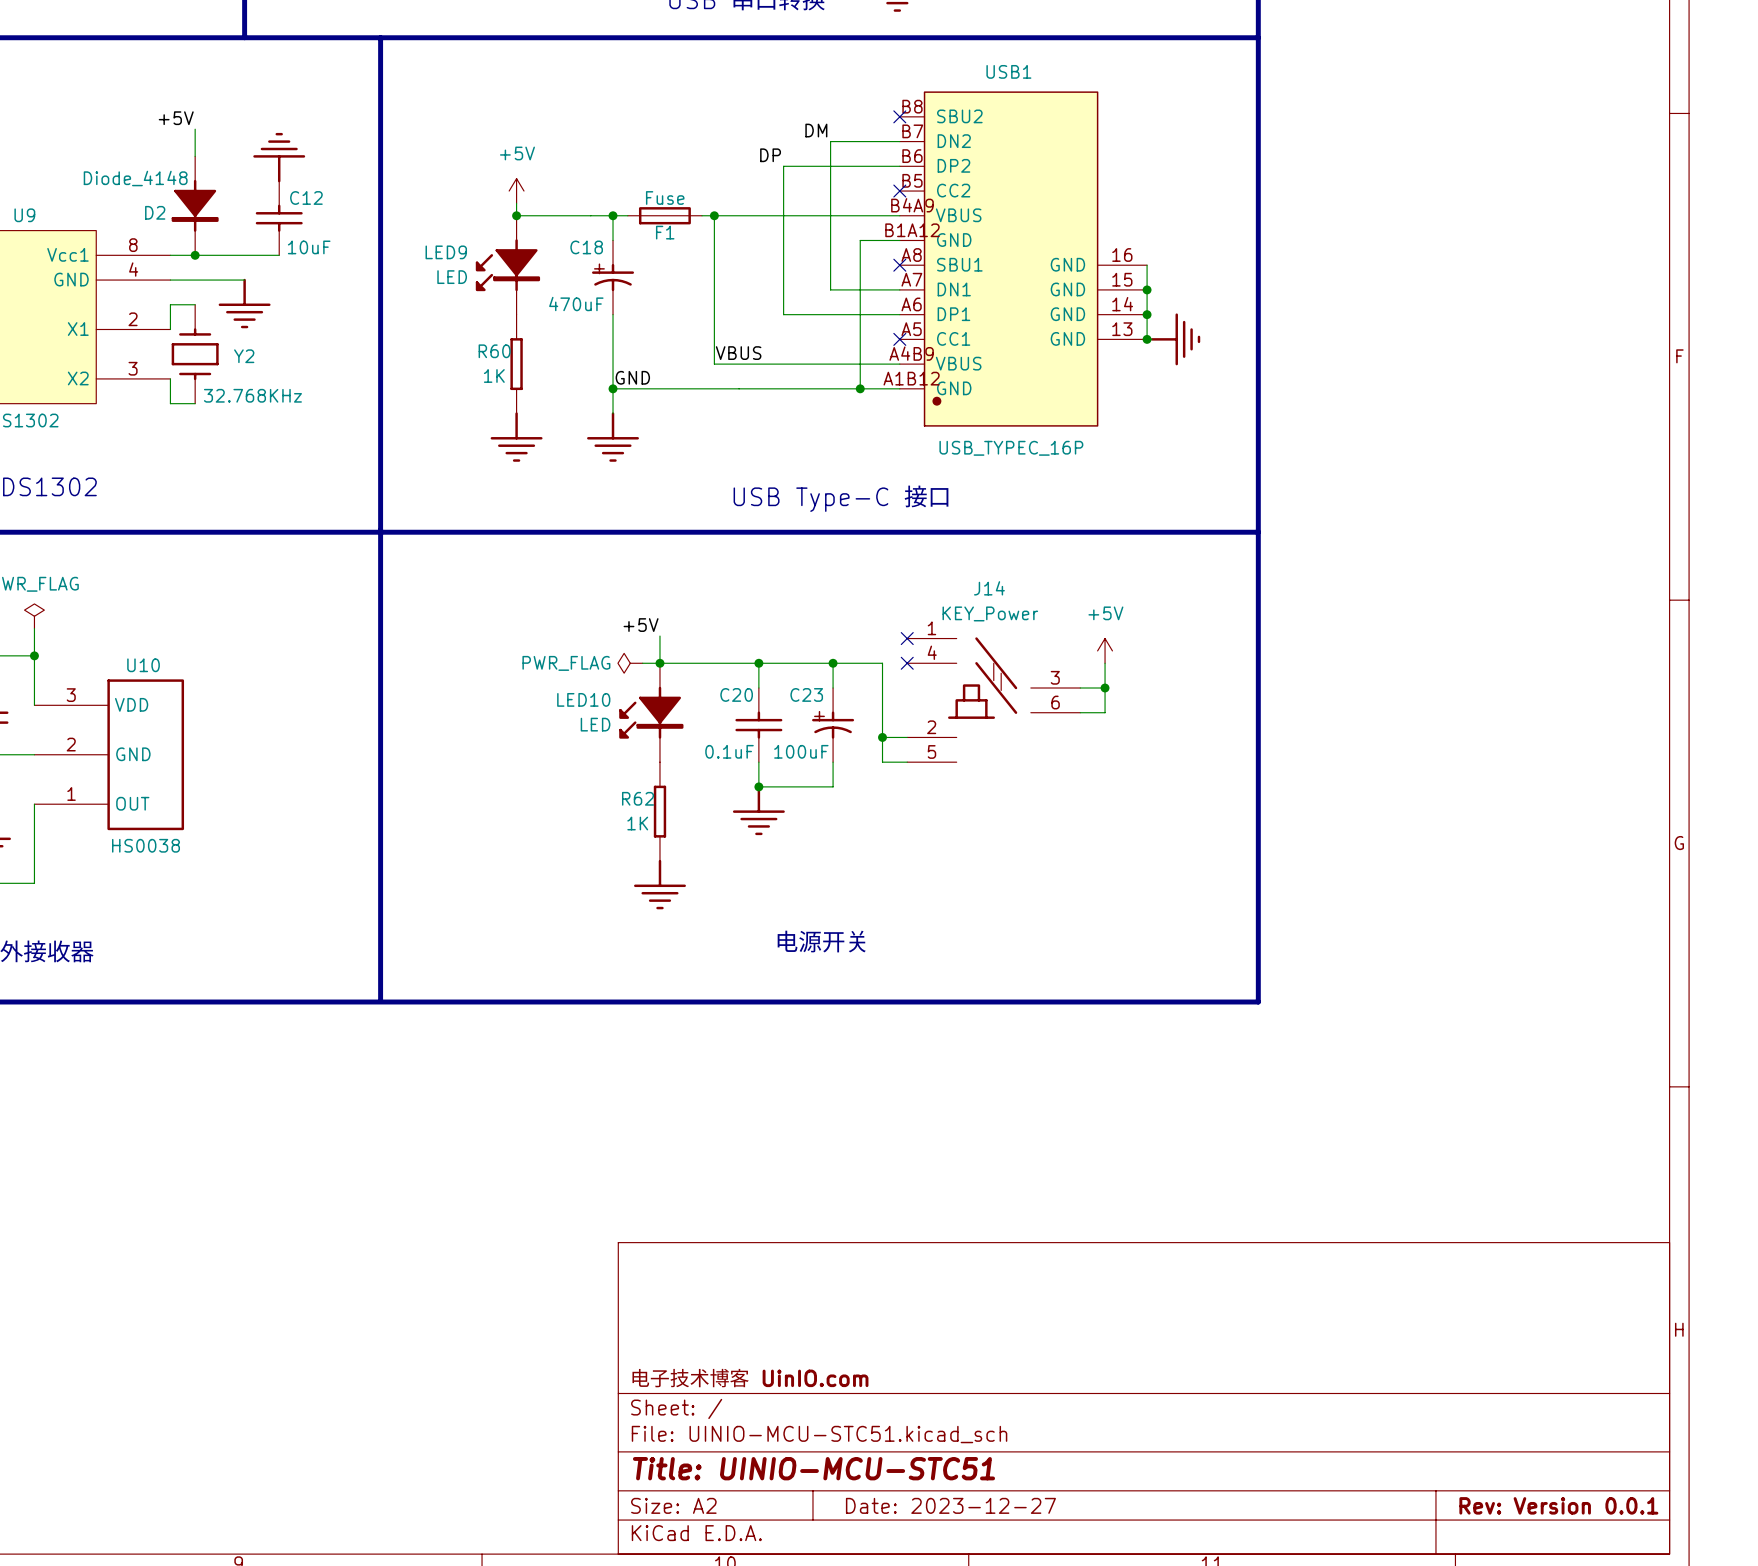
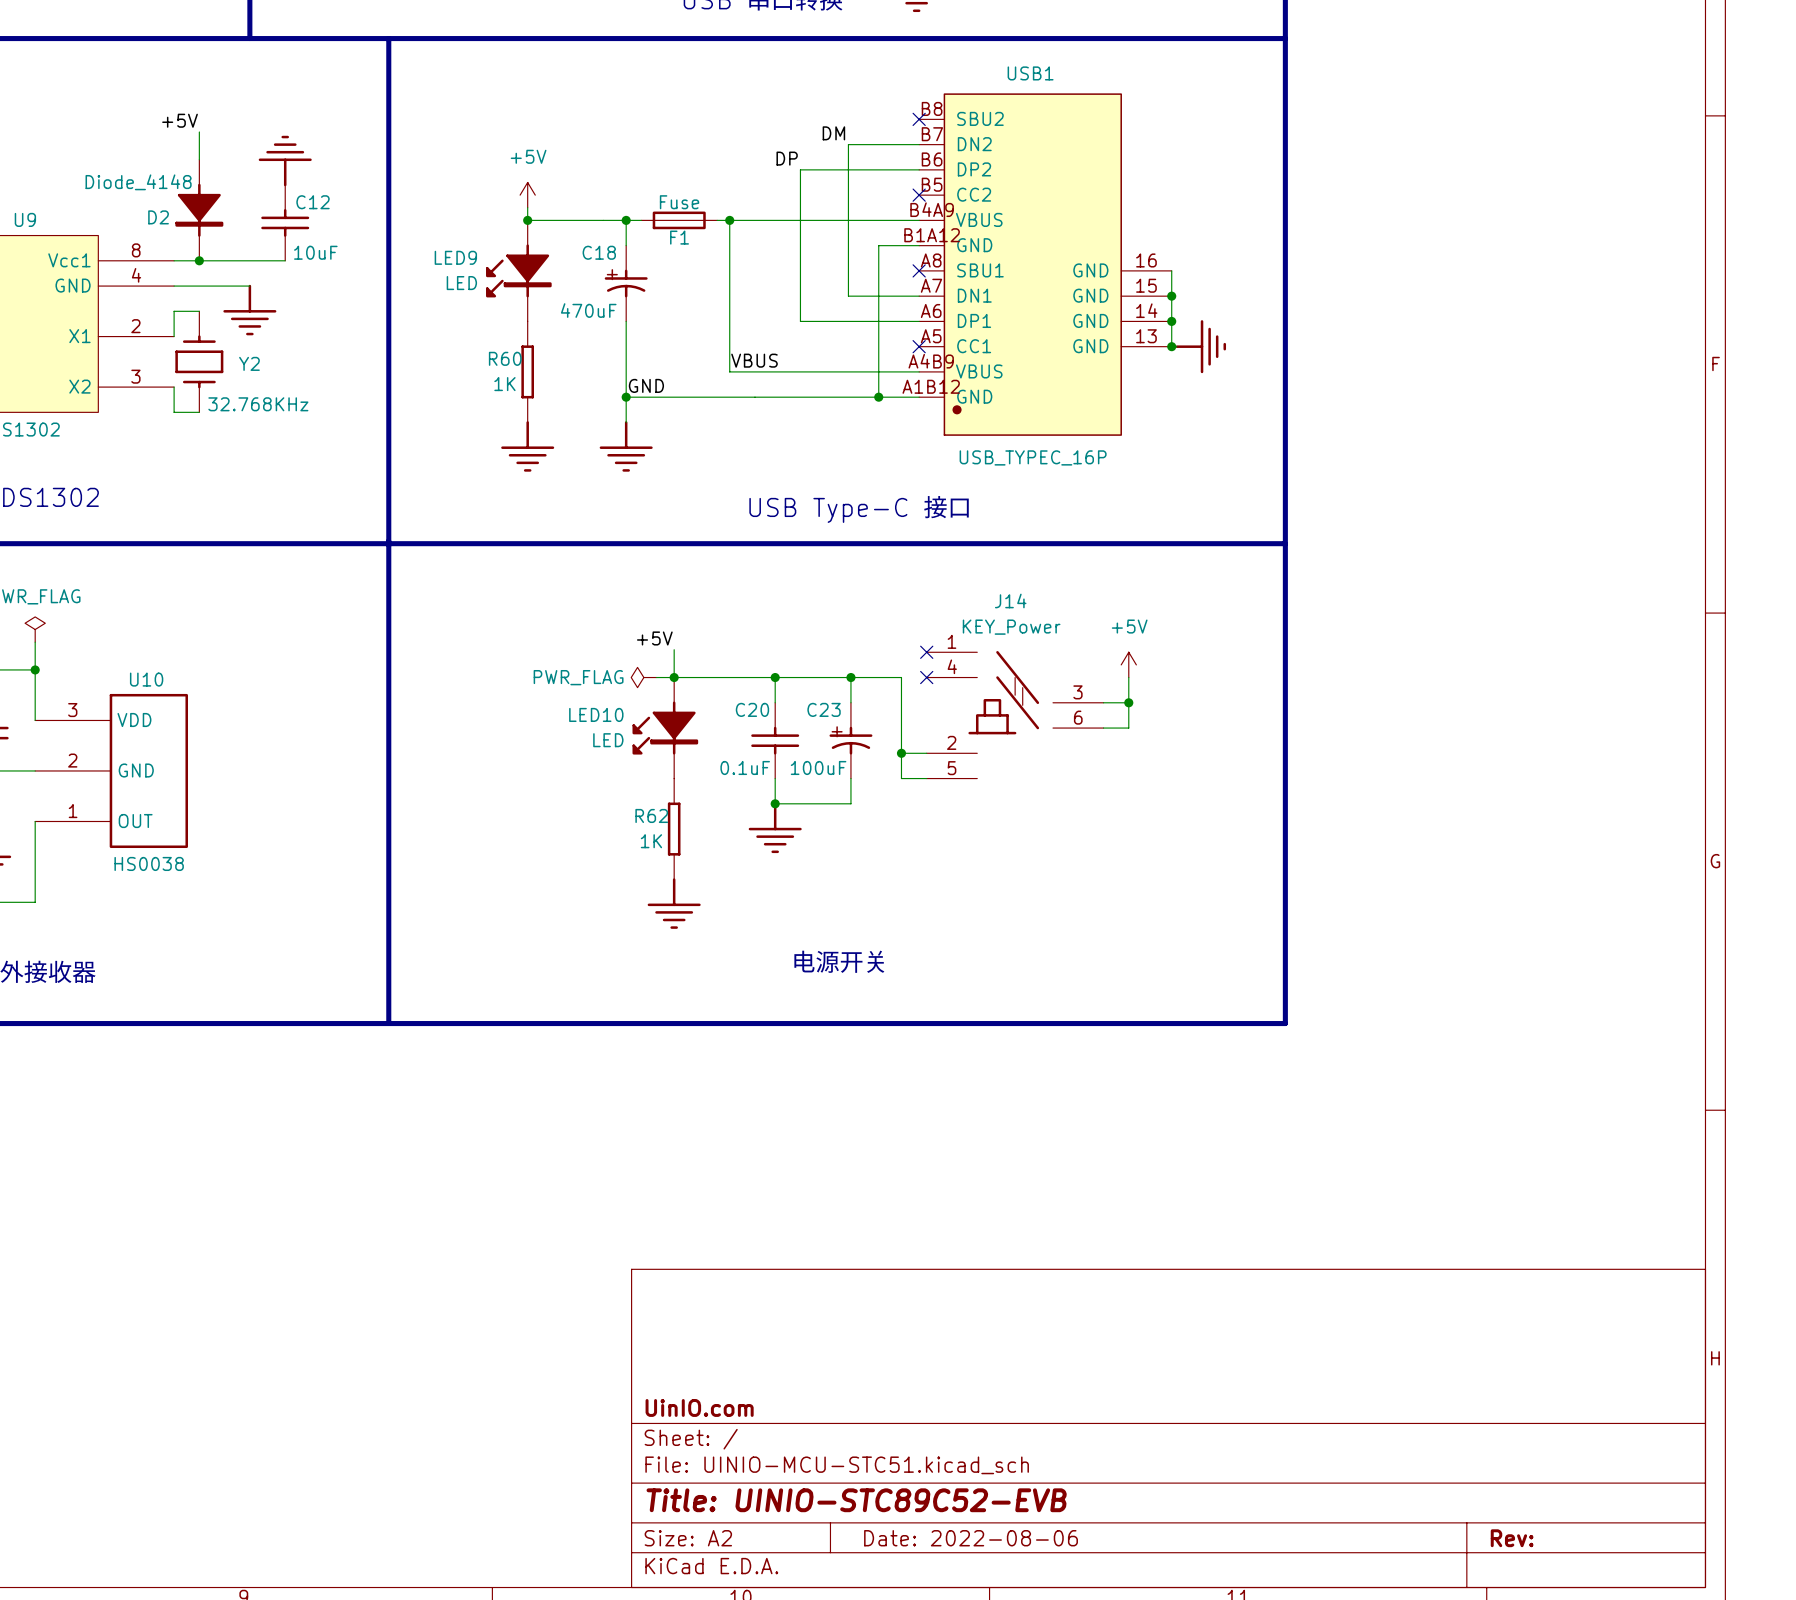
title block: 电子技术博客 UinIO.com (749, 1378) -> UinIO.com (699, 1407)
title block: Title: UINIO-MCU-STC51 (813, 1468) -> Title: UINIO-STC89C52-EVB (856, 1500)
title block: Date: 2023-12-27 (950, 1505) -> Date: 2022-08-06 (971, 1538)
title block: Rev: Version 0.0.1 (1558, 1505) -> Rev: (1512, 1538)

